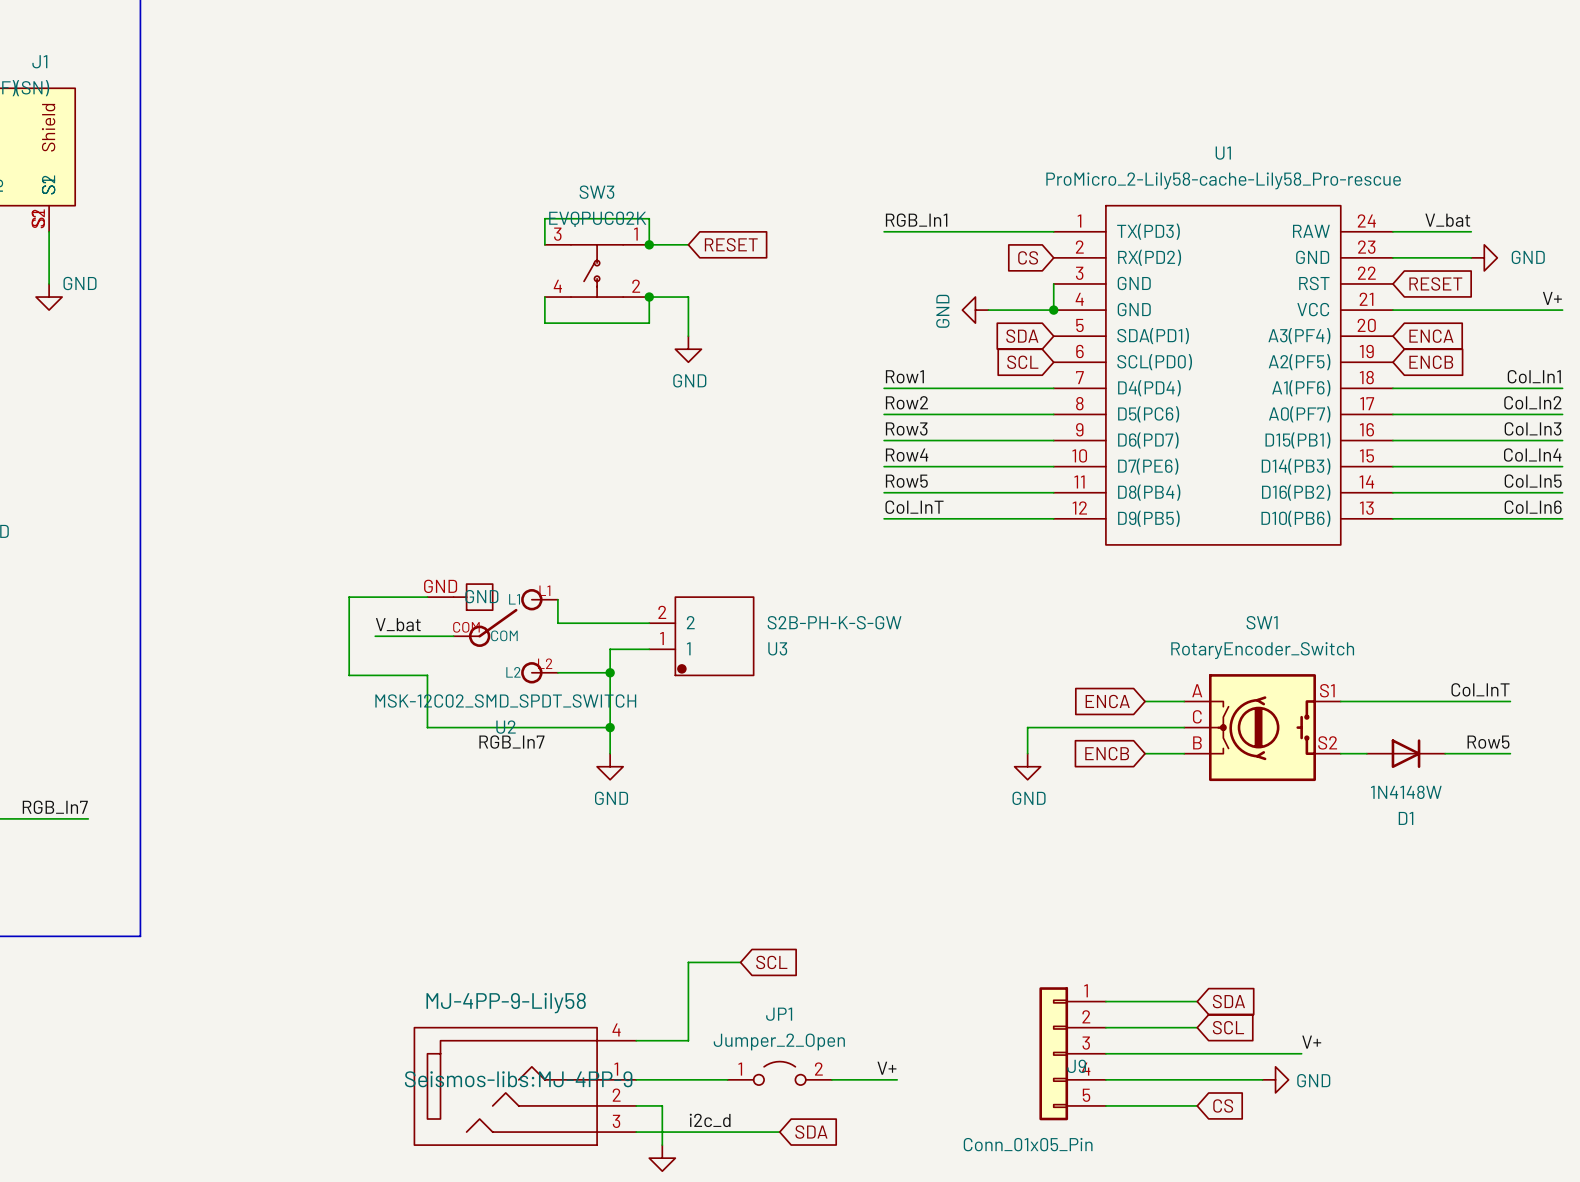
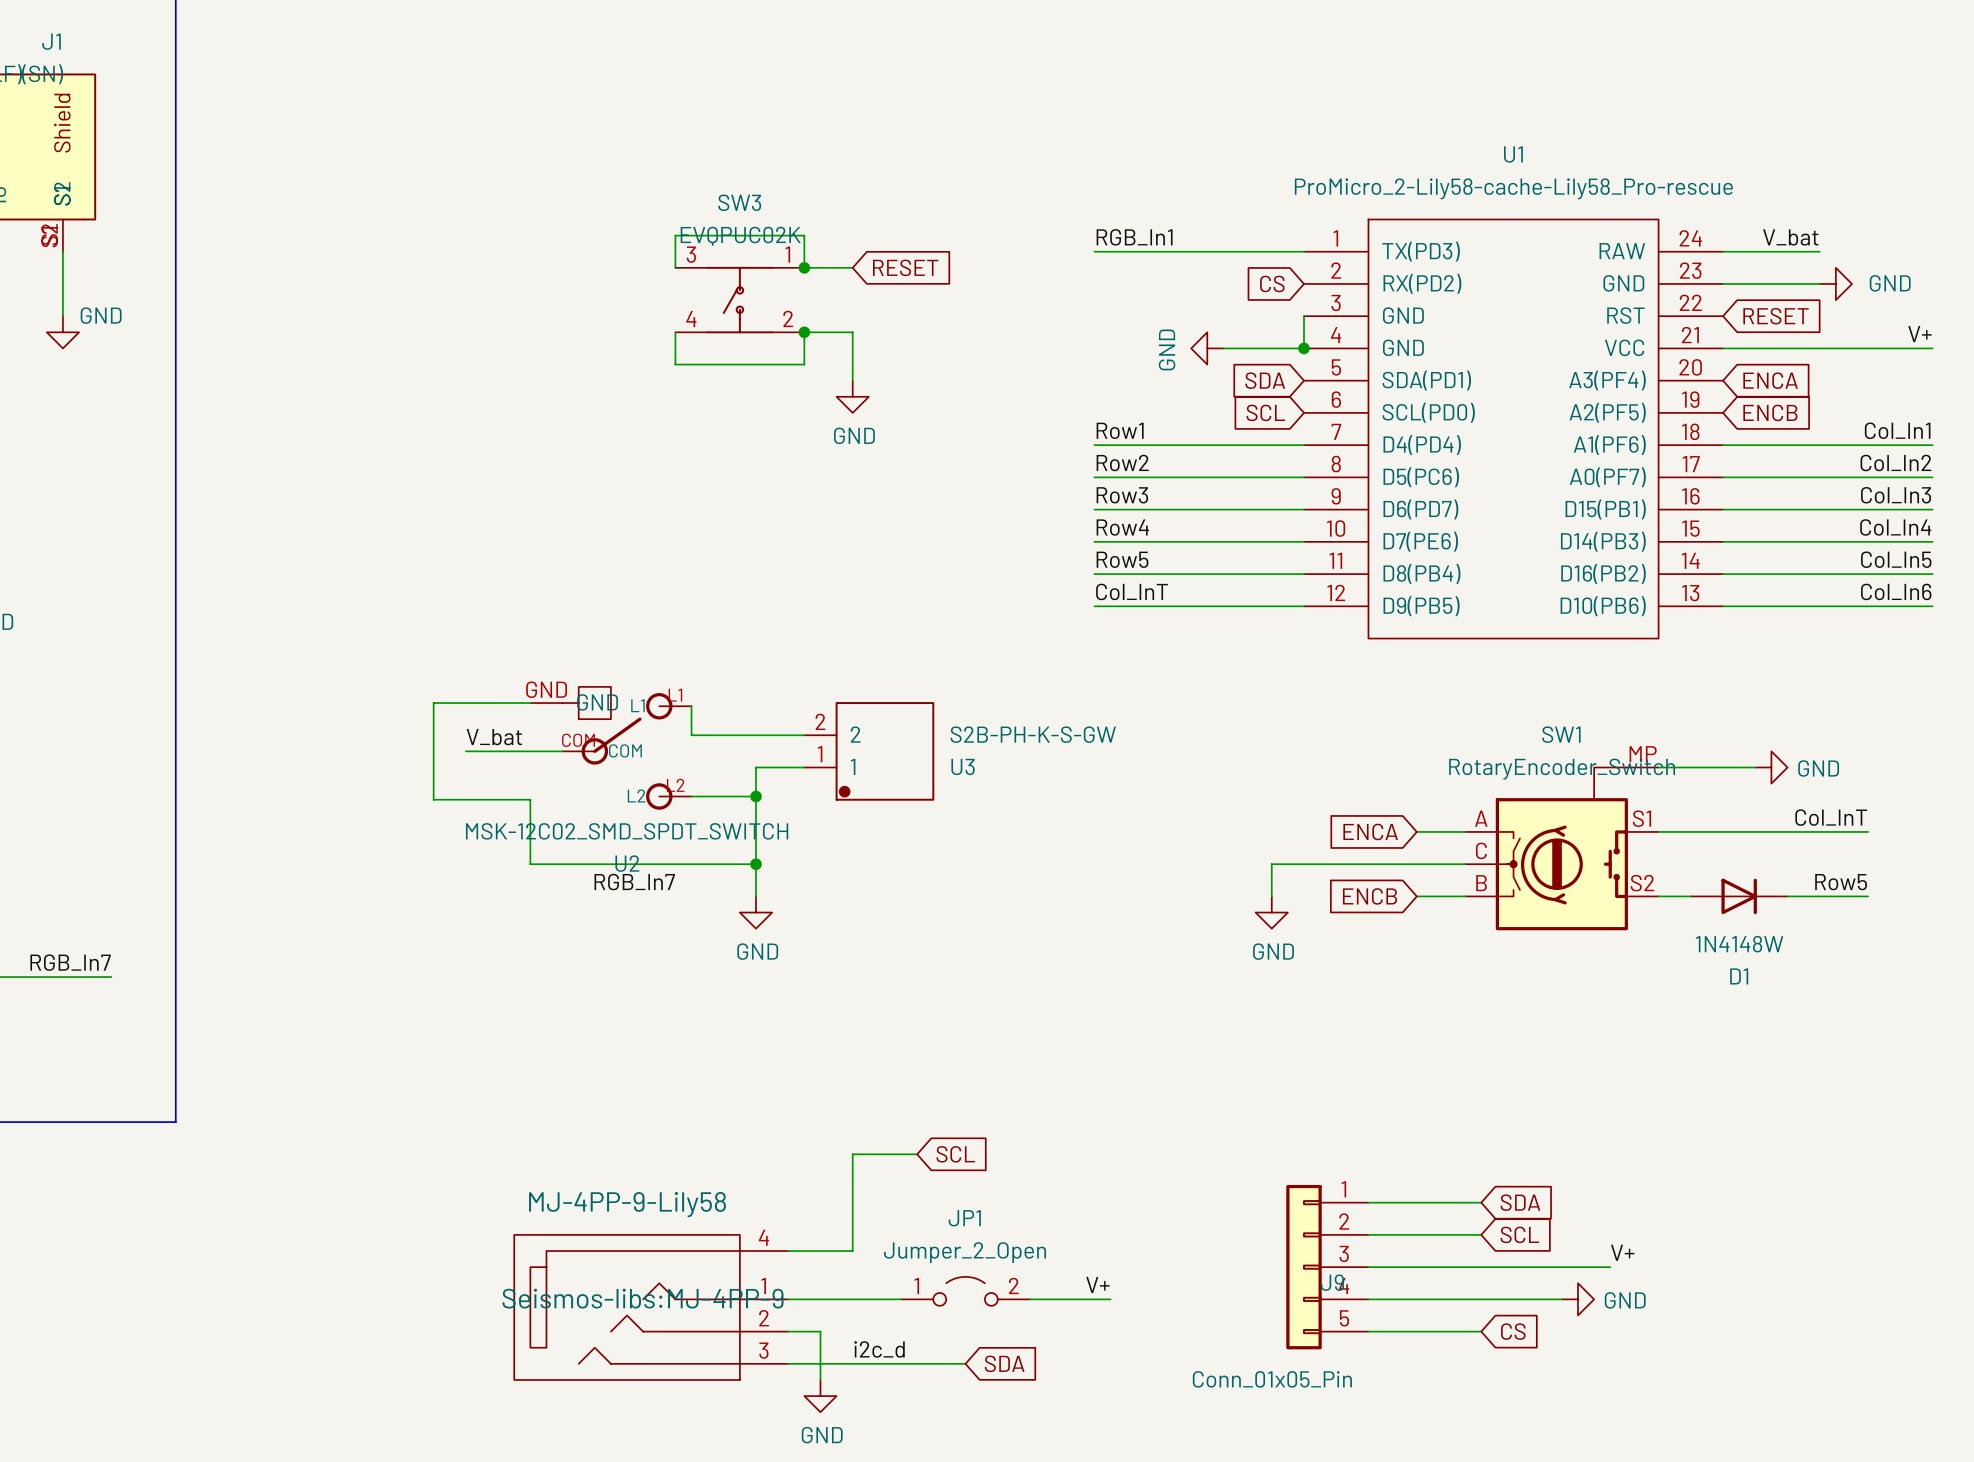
wire: none -> (1658, 767) (1755, 767)
power symbol: none -> GND (1771, 767)
SW1 symbol: [1184, 674, 1341, 782] -> [1465, 767, 1659, 931]

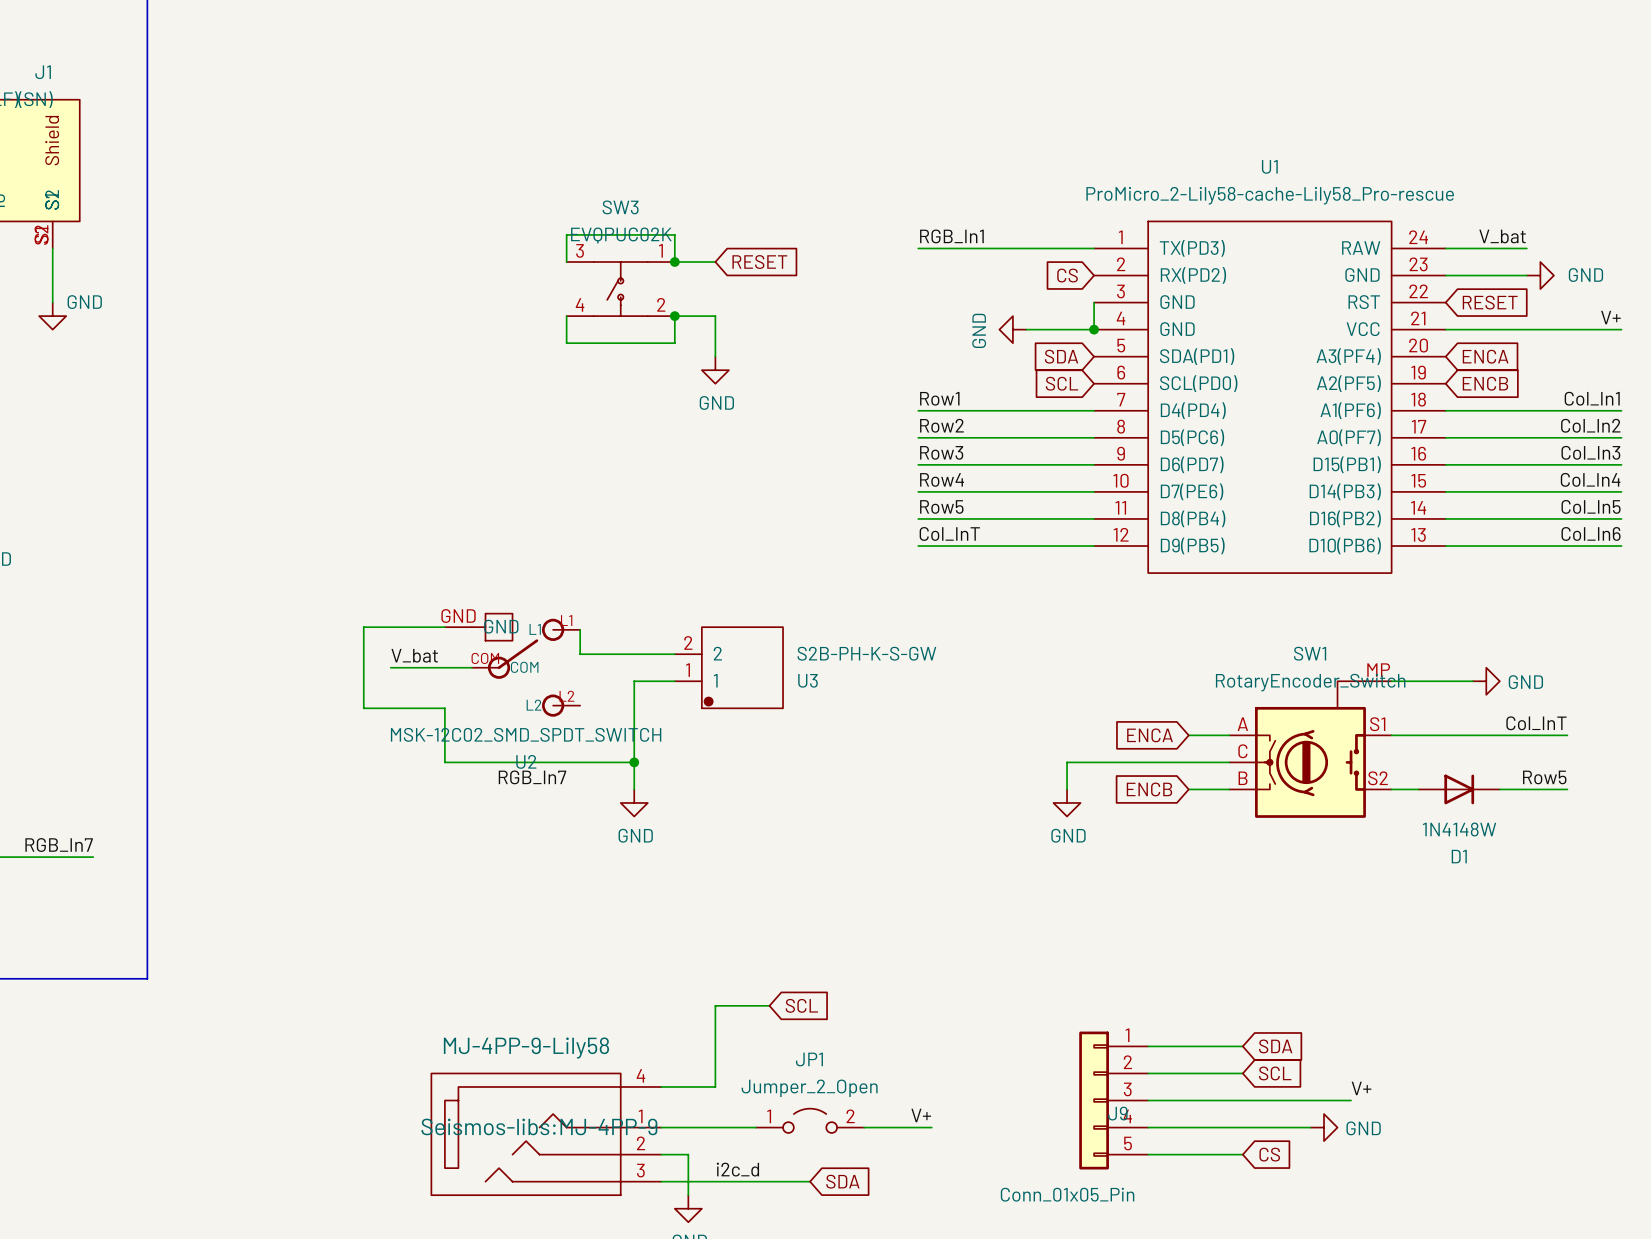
wire: (691, 796) (756, 796) -> none
junction: (756, 796) -> none

